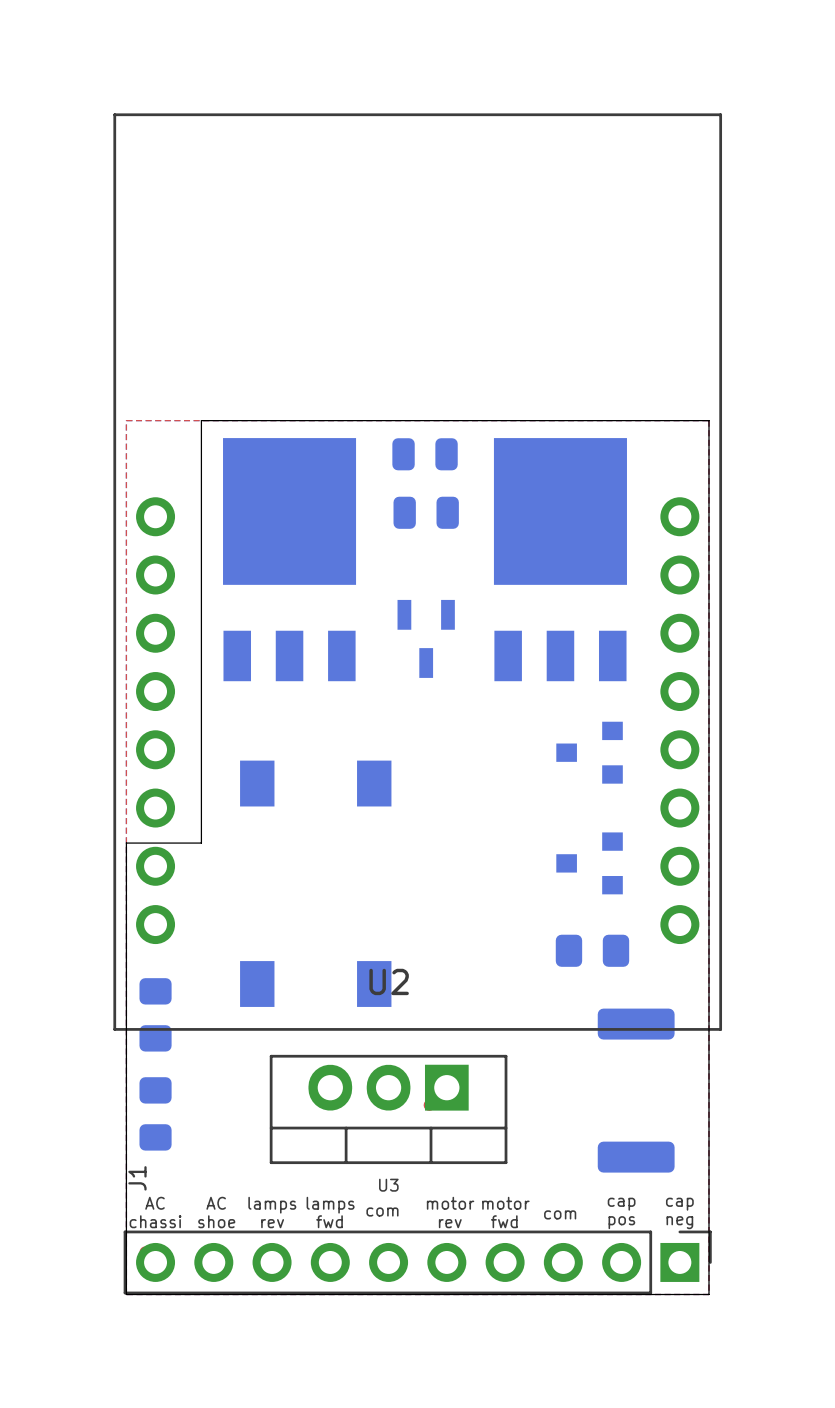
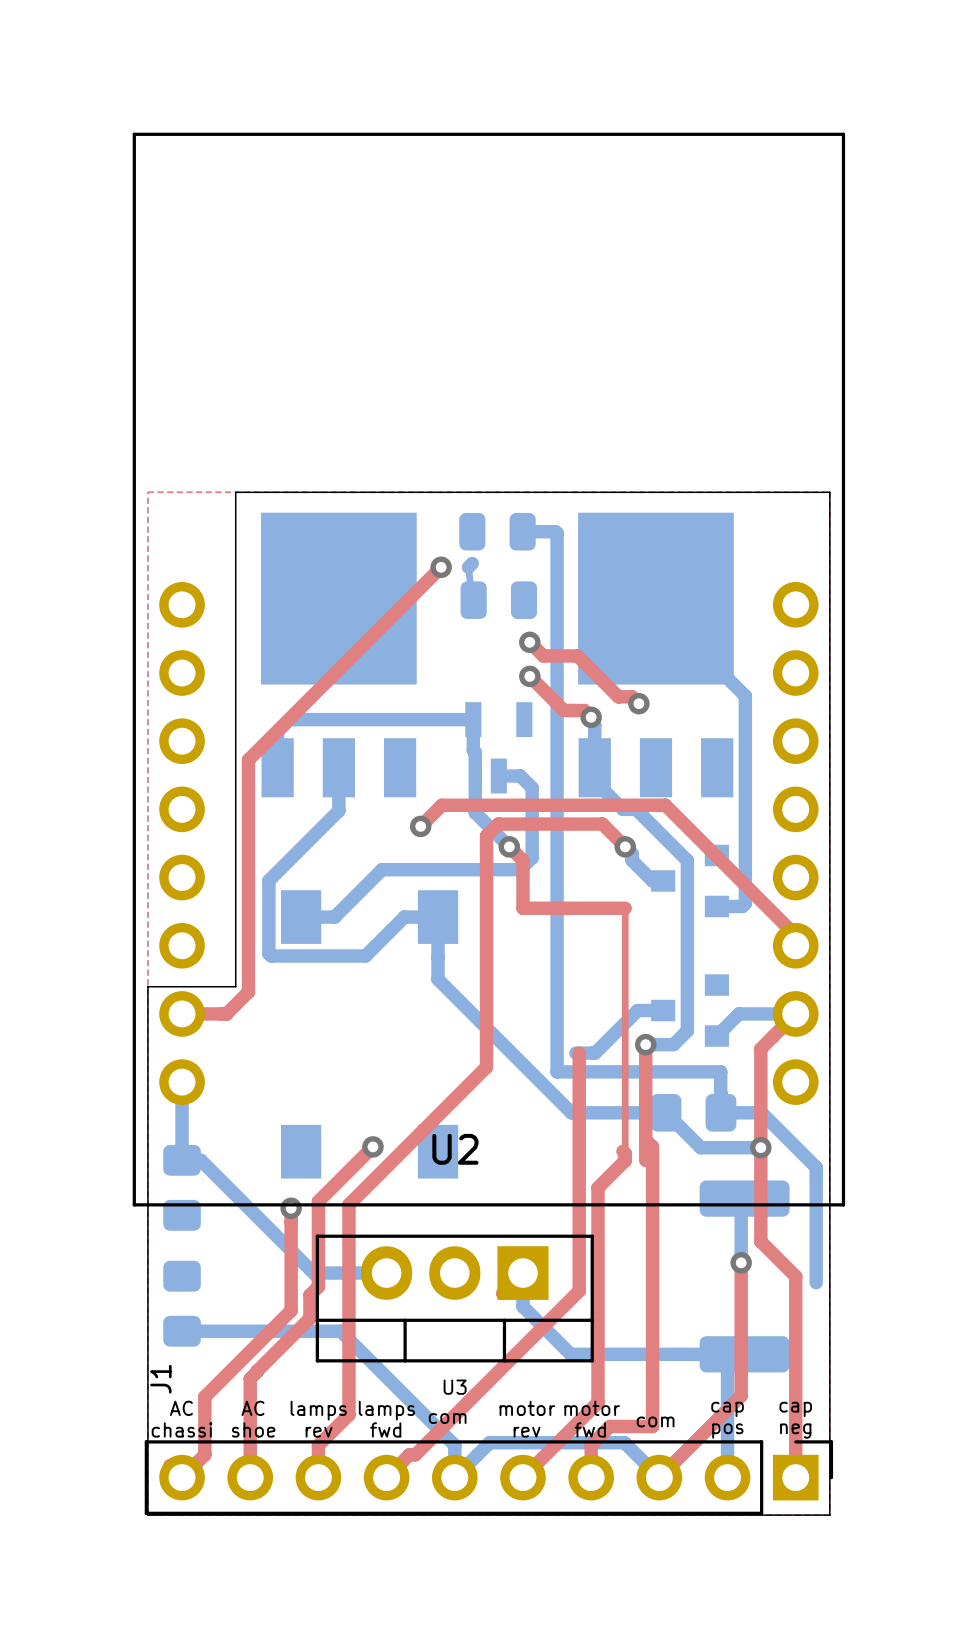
bottom track: none -> (522, 531) (557, 533) (557, 1071) (720, 1071) (720, 1093)
bottom track: none -> (472, 563) (468, 567) (473, 600)
top track: none -> (441, 567) (248, 759) (248, 992) (226, 1013) (182, 1013) (221, 1013)
via: none -> (441, 567)
bottom track: none -> (655, 606) (745, 696) (745, 903) (742, 906) (716, 906)
top track: none -> (529, 642) (543, 655) (577, 655) (618, 696) (632, 696) (638, 703)
via: none -> (529, 642)
top track: none -> (529, 676) (563, 710) (584, 710) (591, 717)
via: none -> (529, 676)
via: none -> (638, 703)
bottom track: none -> (591, 717) (591, 721) (594, 724) (594, 781) (622, 809) (636, 809) (687, 860) (687, 1030) (673, 1044) (645, 1044)
via: none -> (591, 717)
bottom track: none -> (277, 767) (277, 731) (291, 717) (294, 719) (473, 719) (475, 812) (509, 846)
bottom track: none -> (338, 767) (338, 810) (268, 880) (268, 953) (271, 956) (365, 956) (404, 917) (438, 917) (438, 979) (571, 1112) (665, 1112) (700, 1147) (760, 1147)
bottom track: none -> (498, 776) (520, 776) (532, 787) (532, 857) (520, 869) (382, 869) (334, 917) (301, 917) (302, 917)
top track: none -> (420, 826) (441, 805) (665, 805) (795, 935) (795, 945)
via: none -> (420, 826)
top track: none -> (509, 846) (522, 860) (522, 908) (625, 908) (625, 1157)
via: none -> (509, 846)
bottom track: none -> (625, 846) (632, 853) (632, 860) (652, 880) (663, 880)
top track: none -> (625, 846) (602, 824) (498, 824) (486, 835) (486, 1067) (348, 1204) (348, 1414) (318, 1445) (318, 1477)
via: none -> (625, 846)
bottom track: none -> (663, 1010) (637, 1010) (595, 1053) (575, 1053)
bottom track: none -> (795, 1013) (738, 1013) (716, 1036)
top track: none -> (795, 1024) (795, 1013) (760, 1048) (760, 1241) (795, 1276) (795, 1477)
top track: none -> (645, 1044) (645, 1160)
via: none -> (645, 1044)
top track: none -> (579, 1053) (579, 1291) (415, 1454) (409, 1454) (386, 1477)
bottom track: none -> (182, 1082) (182, 1160) (200, 1160) (317, 1276) (321, 1273) (386, 1273)
bottom track: none -> (720, 1094) (720, 1112) (761, 1112) (816, 1167) (816, 1282)
top track: none -> (645, 1140) (652, 1146) (652, 1426) (610, 1426) (591, 1445) (591, 1477)
top track: none -> (372, 1146) (318, 1201) (318, 1286) (309, 1295) (309, 1318) (250, 1378) (250, 1477)
via: none -> (372, 1146)
via: none -> (760, 1147)
top track: none -> (622, 1151) (625, 1153) (625, 1160) (597, 1187) (597, 1402) (522, 1477)
bottom track: none -> (744, 1198) (741, 1202) (741, 1262)
top track: none -> (291, 1208) (291, 1310) (204, 1396) (204, 1454) (182, 1477)
via: none -> (291, 1208)
top track: none -> (741, 1262) (741, 1395) (659, 1477)
via: none -> (741, 1262)
bottom track: none -> (522, 1273) (522, 1306) (570, 1354) (744, 1354) (727, 1371) (727, 1477)
bottom track: none -> (182, 1331) (340, 1331) (454, 1445) (454, 1477) (489, 1442) (624, 1442) (659, 1477)

